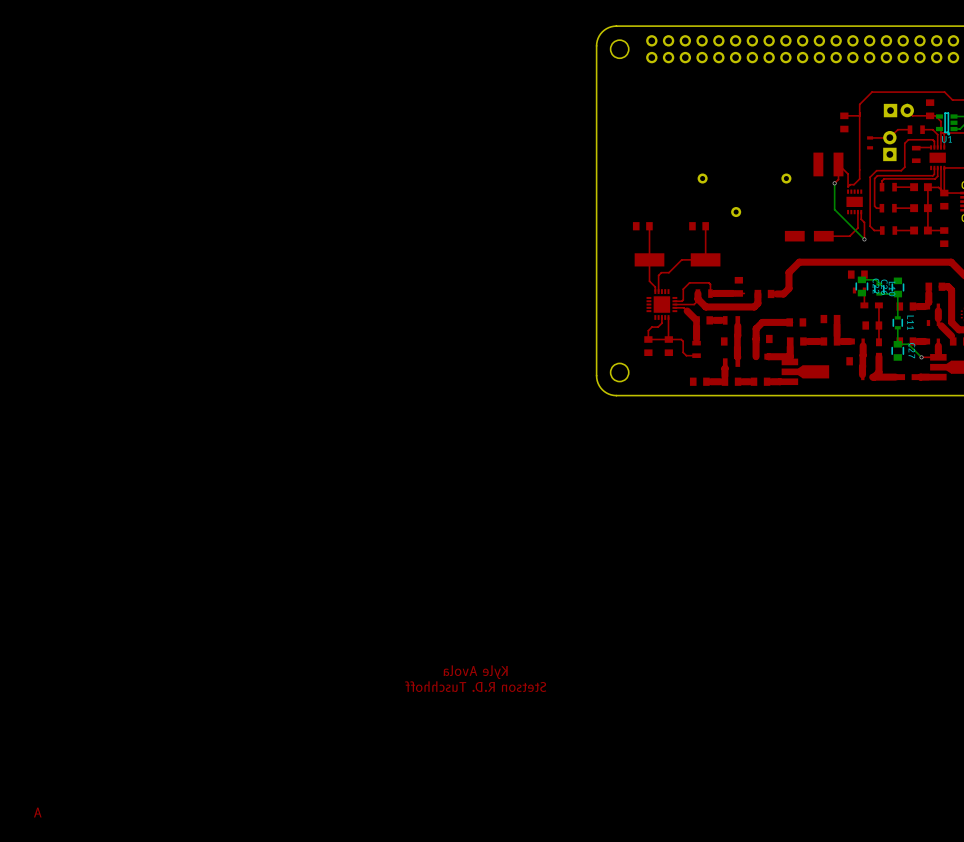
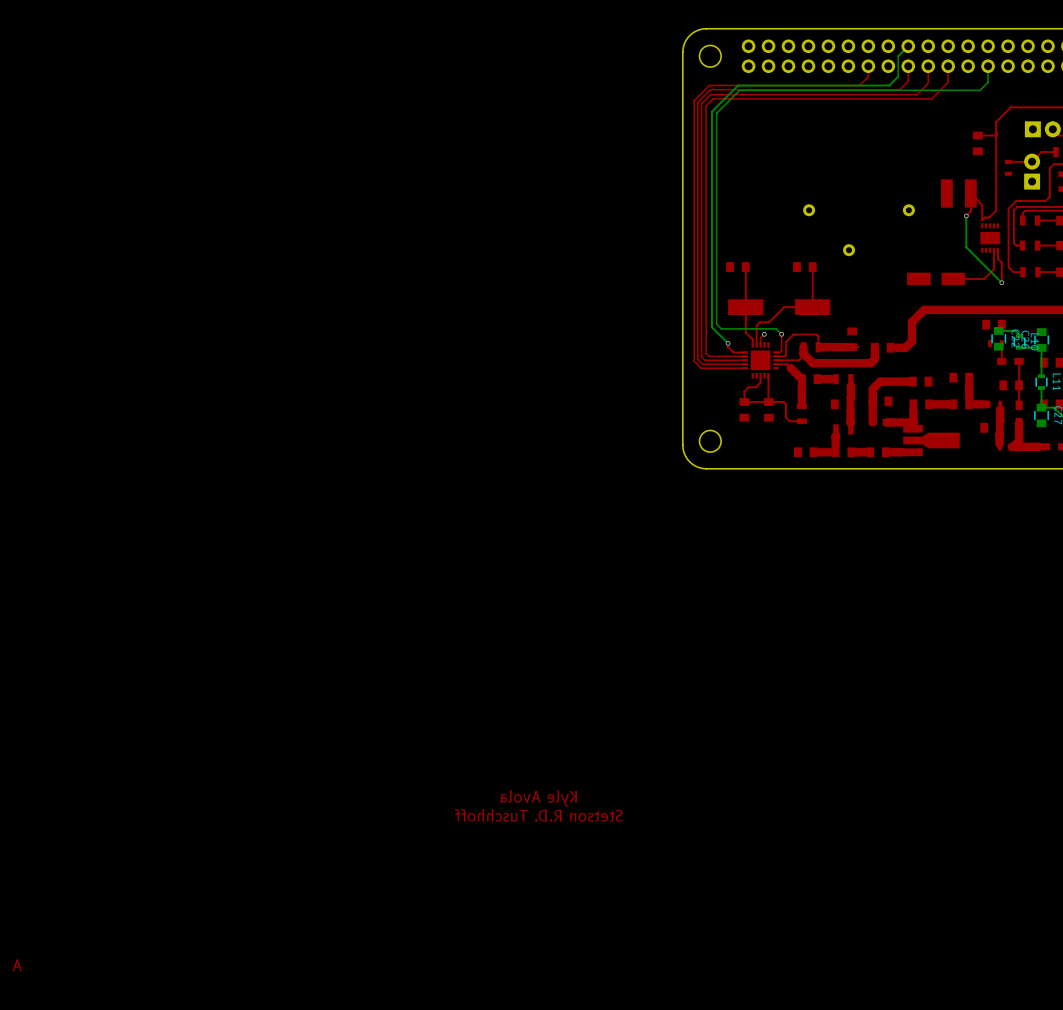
bottom track: none -> (908, 46) (898, 56) (898, 76) (889, 85) (738, 85) (711, 111) (711, 327) (728, 343)
top track: none -> (868, 66) (868, 76) (859, 85) (709, 85) (694, 100) (694, 361) (701, 368) (745, 368)
top track: none -> (908, 66) (908, 81) (899, 89) (710, 89) (697, 102) (697, 359) (702, 364) (745, 364)
top track: none -> (928, 66) (928, 83) (916, 94) (710, 94) (701, 103) (701, 356) (705, 360) (745, 360)
top track: none -> (948, 66) (948, 82) (931, 98) (713, 98) (706, 105) (706, 353) (709, 356) (745, 356)
bottom track: none -> (988, 66) (988, 82) (980, 90) (739, 90) (716, 113) (716, 324) (721, 328) (776, 328) (781, 334)
top track: none -> (764, 334) (760, 338) (760, 344)
via: none -> (764, 334)
top track: none -> (781, 334) (781, 350) (776, 352)
via: none -> (781, 334)
top track: none -> (728, 343) (728, 346) (733, 352) (745, 352)
via: none -> (728, 343)

